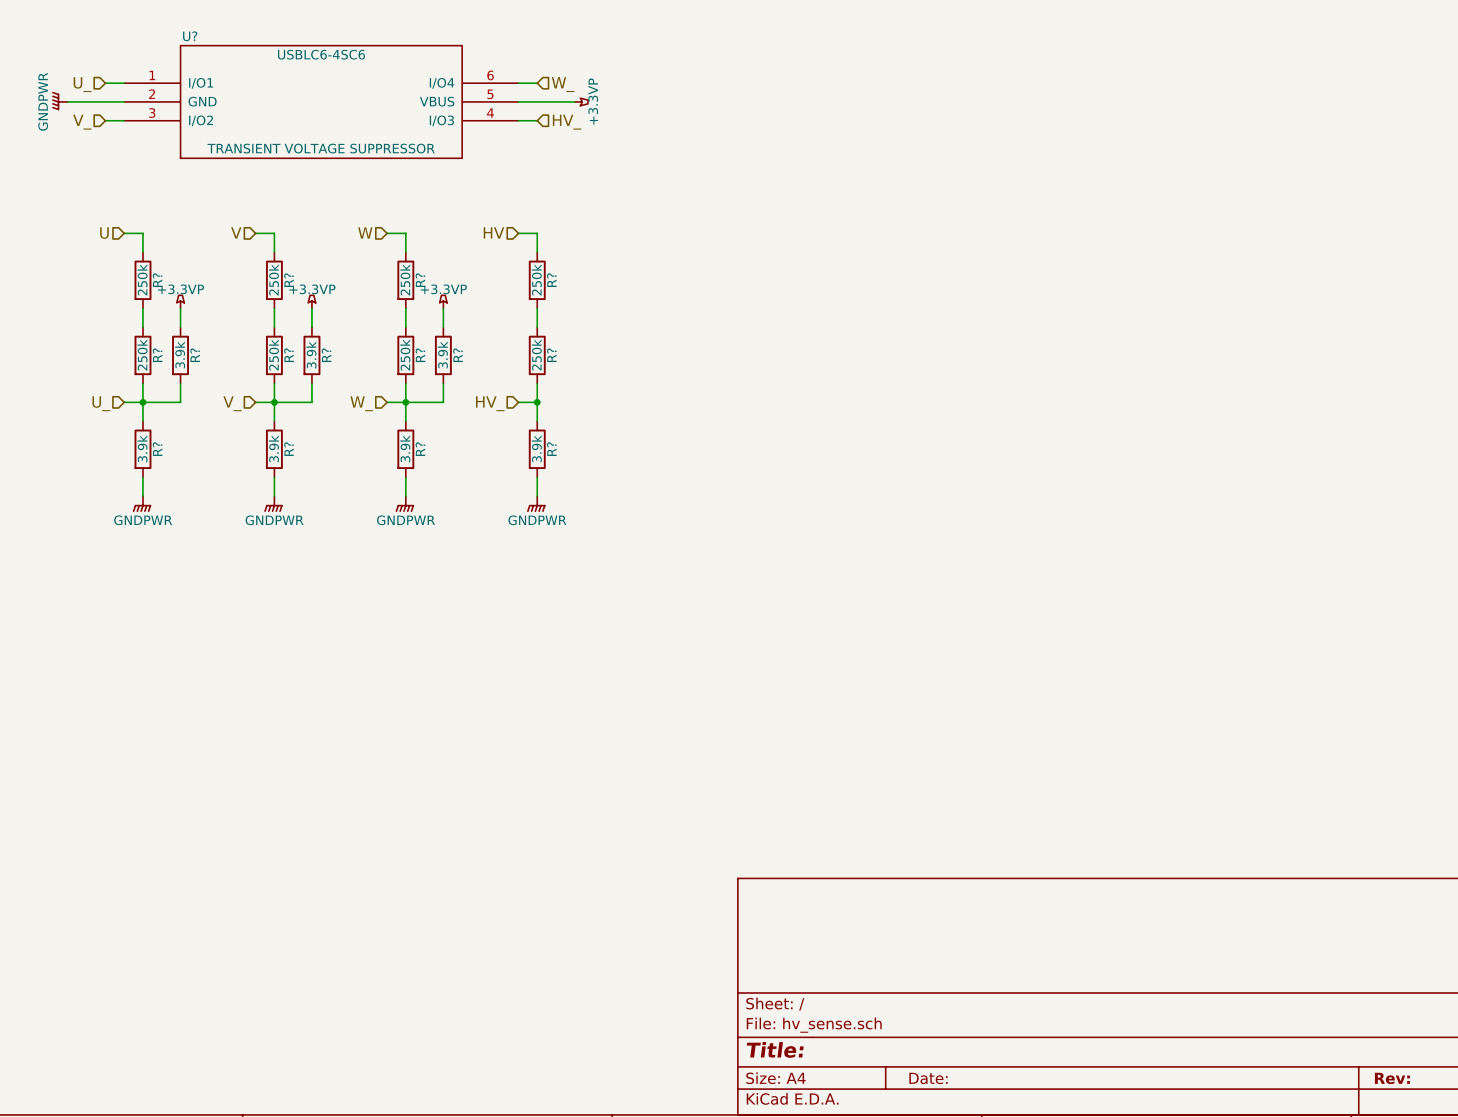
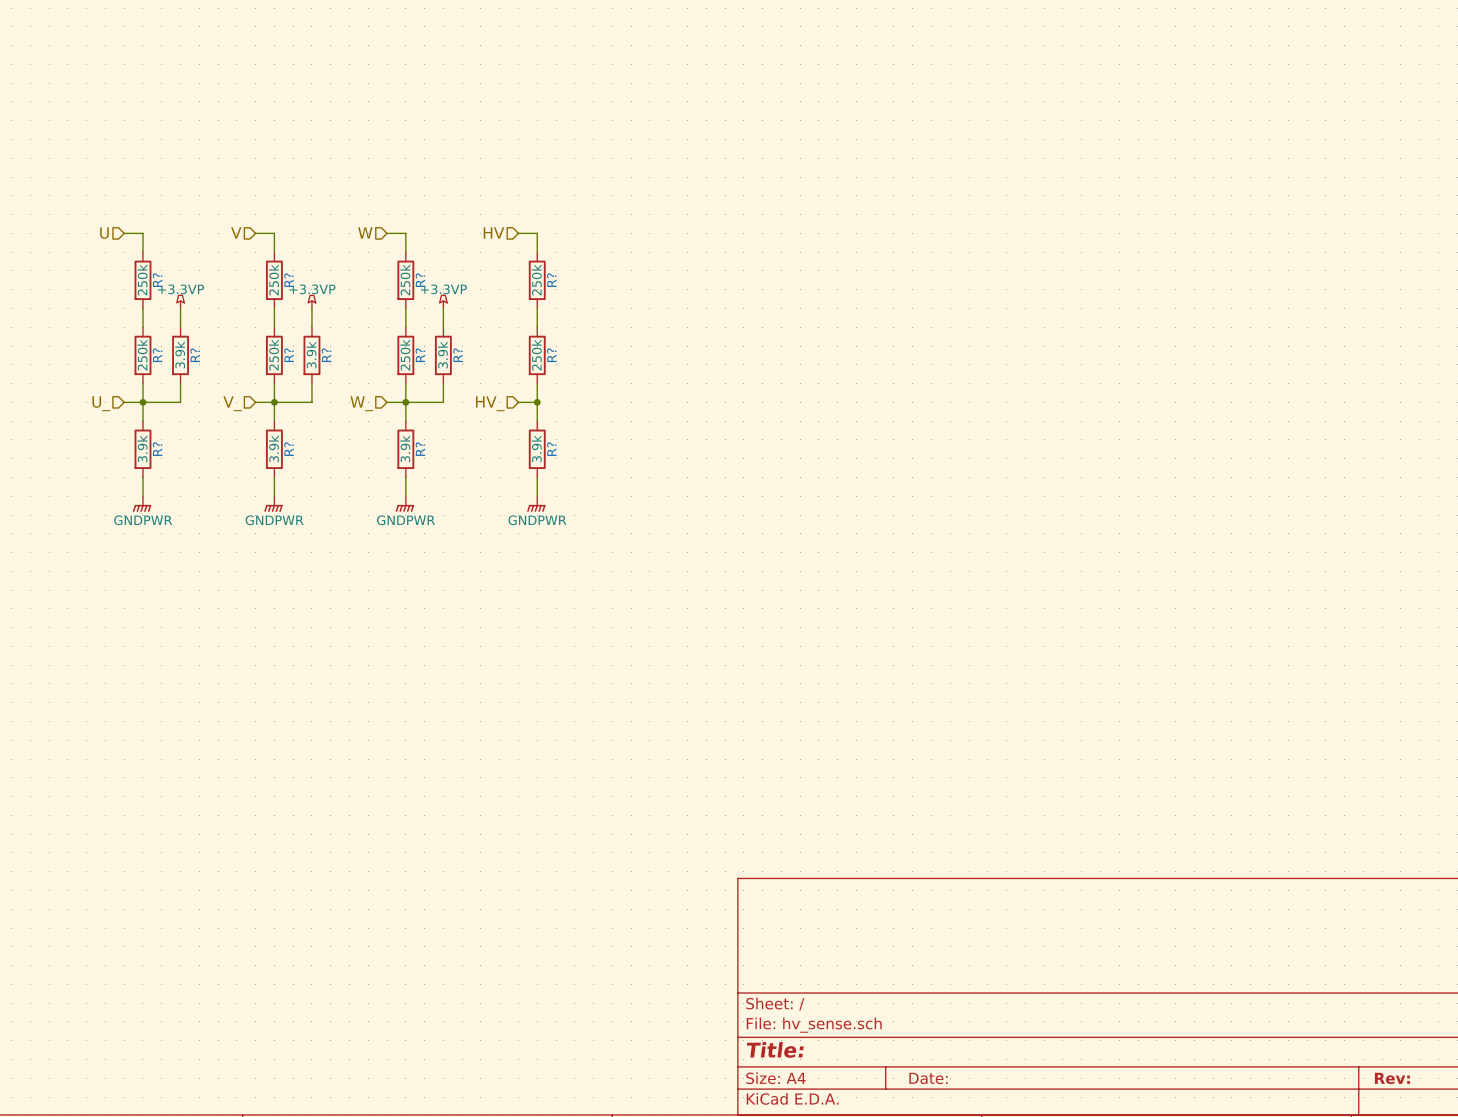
wire: (105, 83) (124, 83) -> none
wire: (518, 83) (537, 83) -> none
hierarchical label: U_ (82, 84) -> none
hierarchical label: W_ (563, 84) -> none
power symbol: GNDPWR (60, 101) -> none
wire: (67, 101) (124, 101) -> none
U?: USBLC6-4SC6 (321, 101) -> none
wire: (518, 101) (574, 101) -> none
power symbol: +3.3VP (581, 101) -> none
wire: (105, 120) (124, 120) -> none
wire: (518, 120) (537, 120) -> none
hierarchical label: V_ (82, 122) -> none
hierarchical label: HV_ (567, 122) -> none

